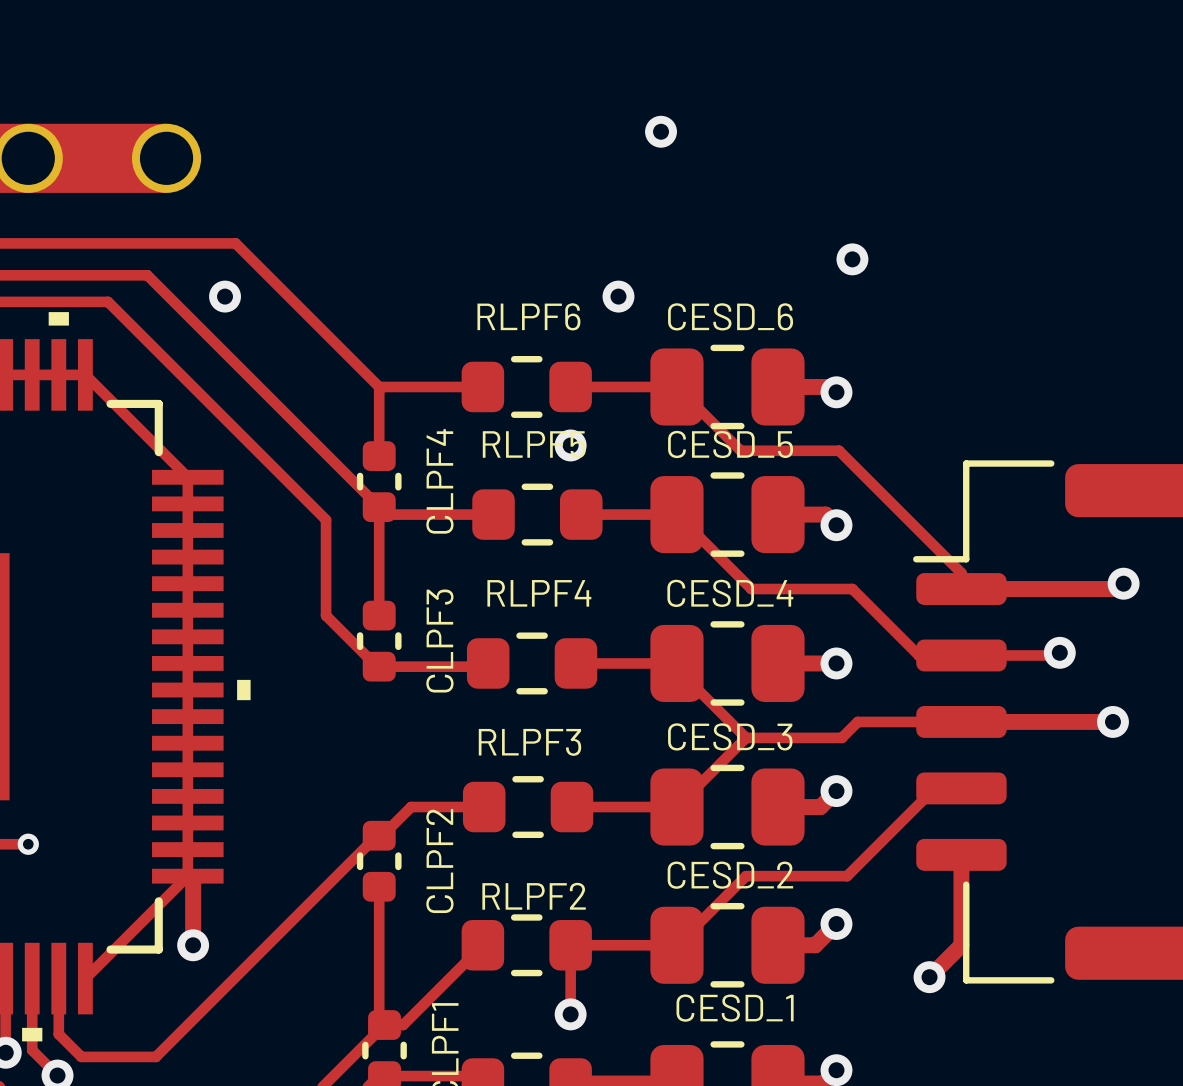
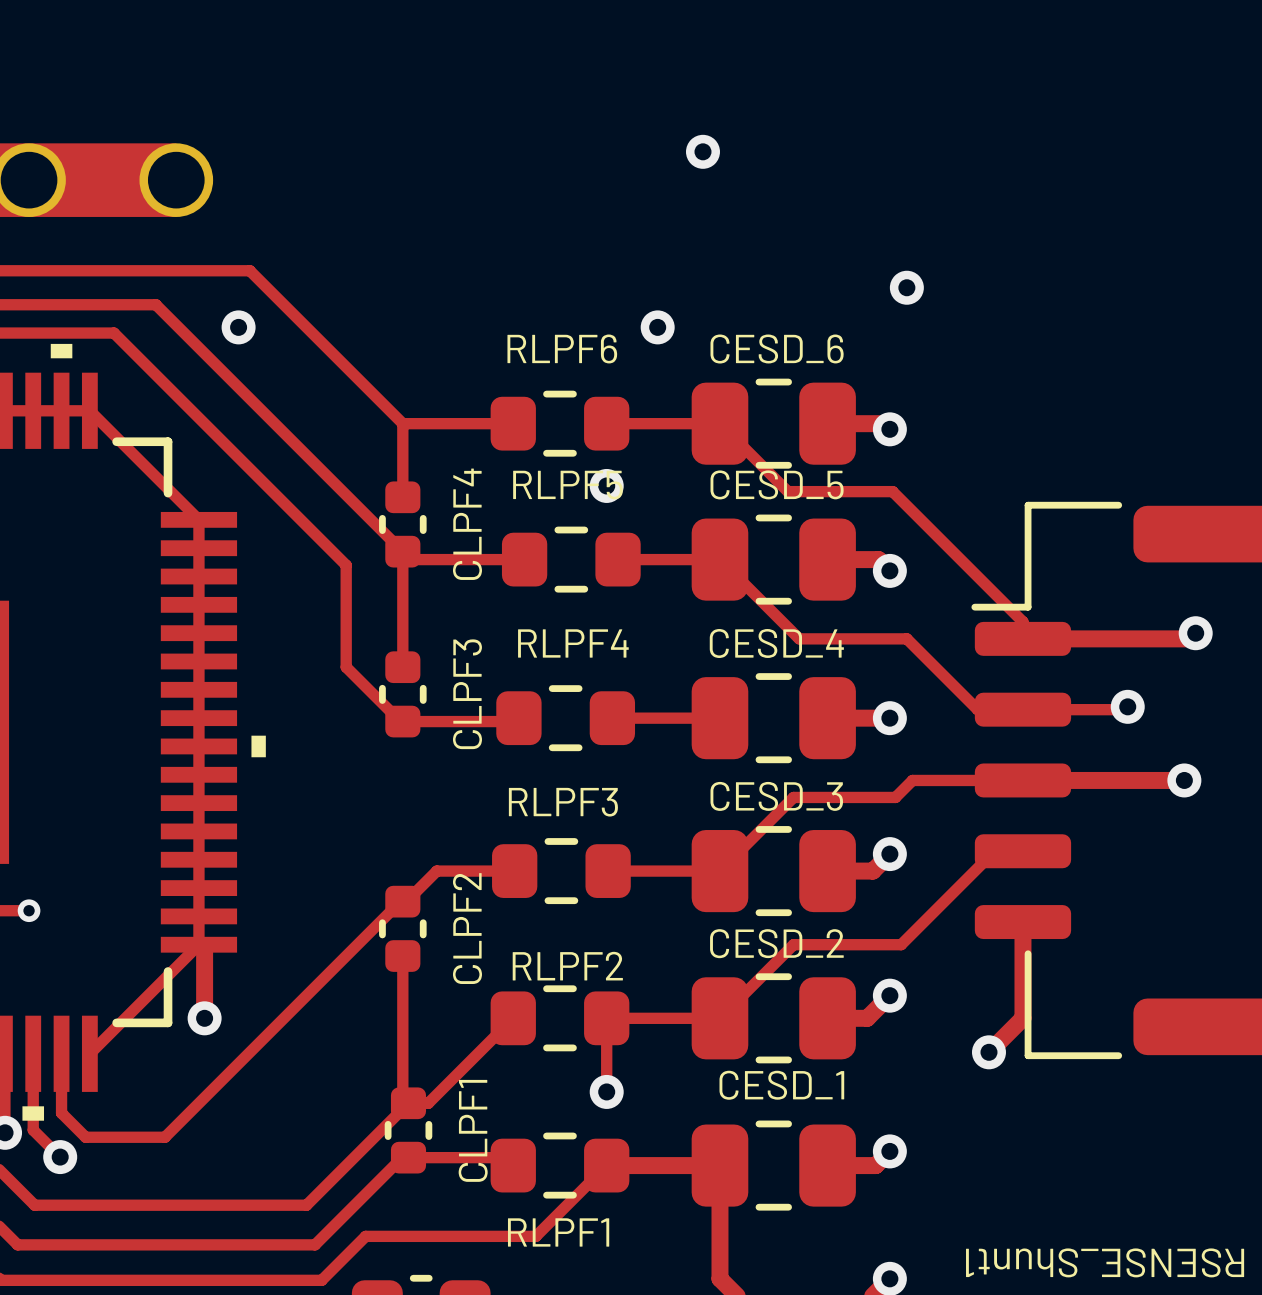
track: (676, 663) (676, 668) (746, 737) -> none

